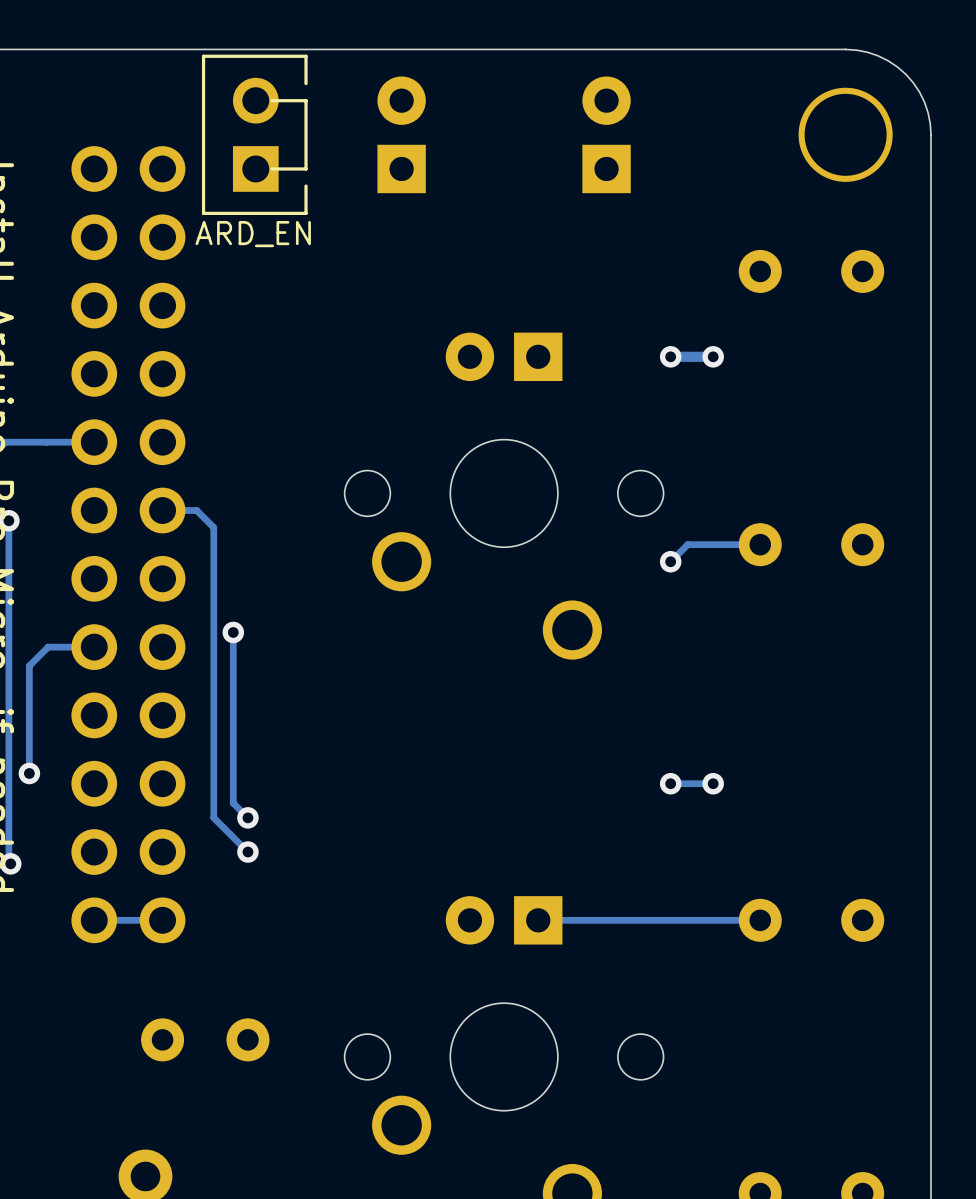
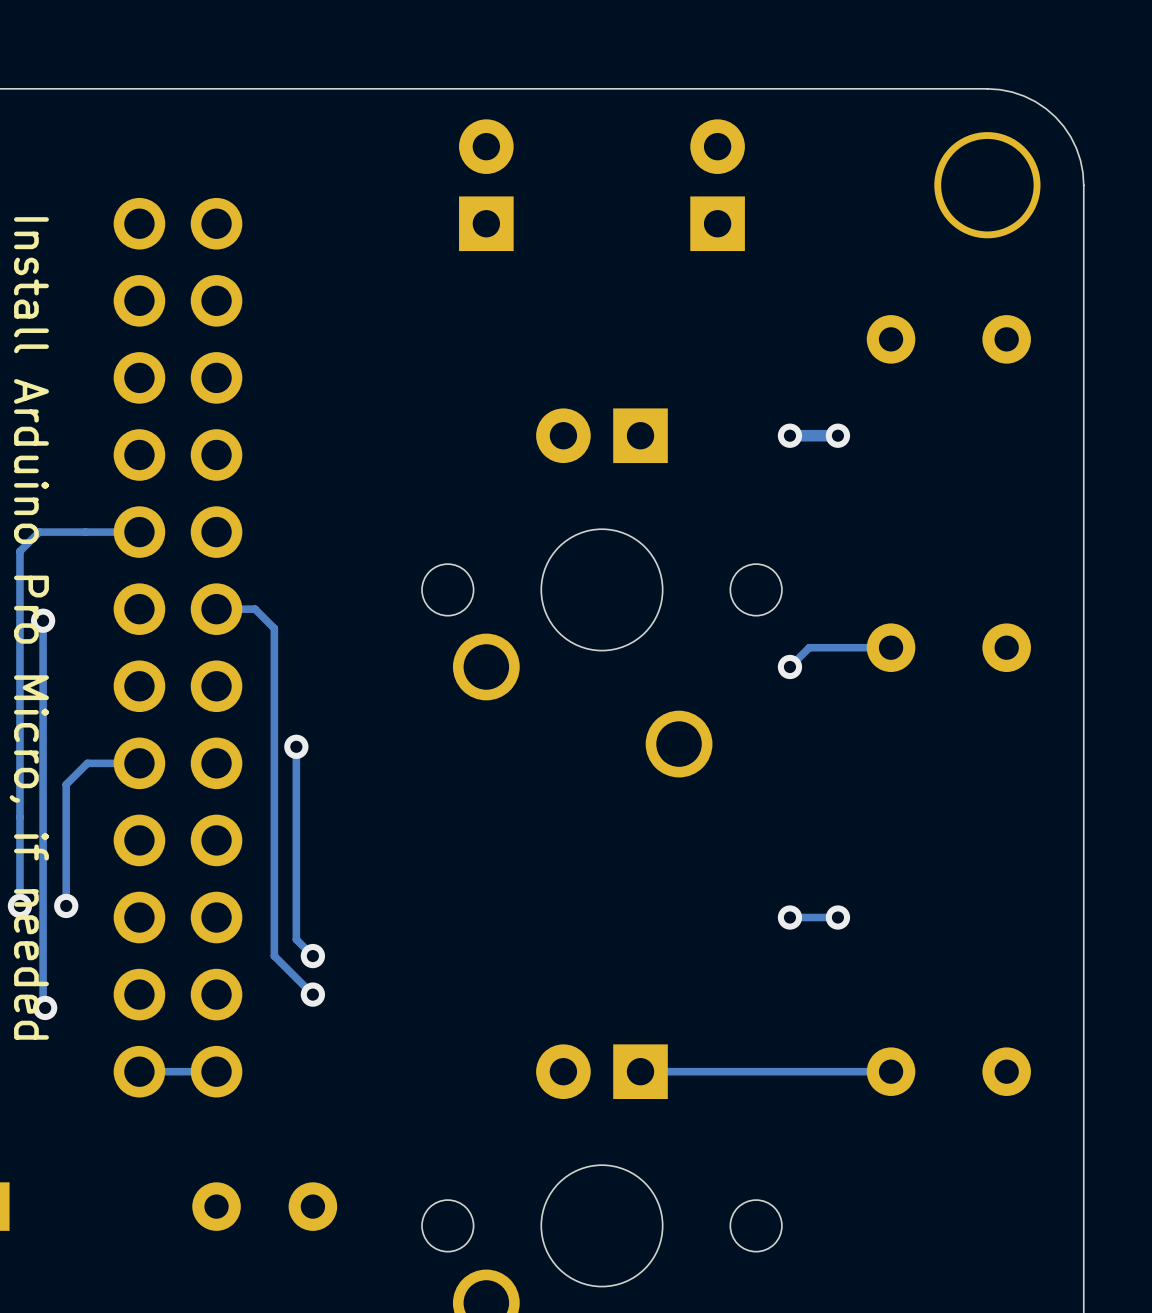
line: (306, 83) (306, 56) (203, 56) (203, 213) (306, 213) (306, 186) -> none
line: (271, 100) (306, 100) (306, 168) (271, 168) -> none
part: (255, 134) -> none
text: ARD_EN (253, 234) -> none

